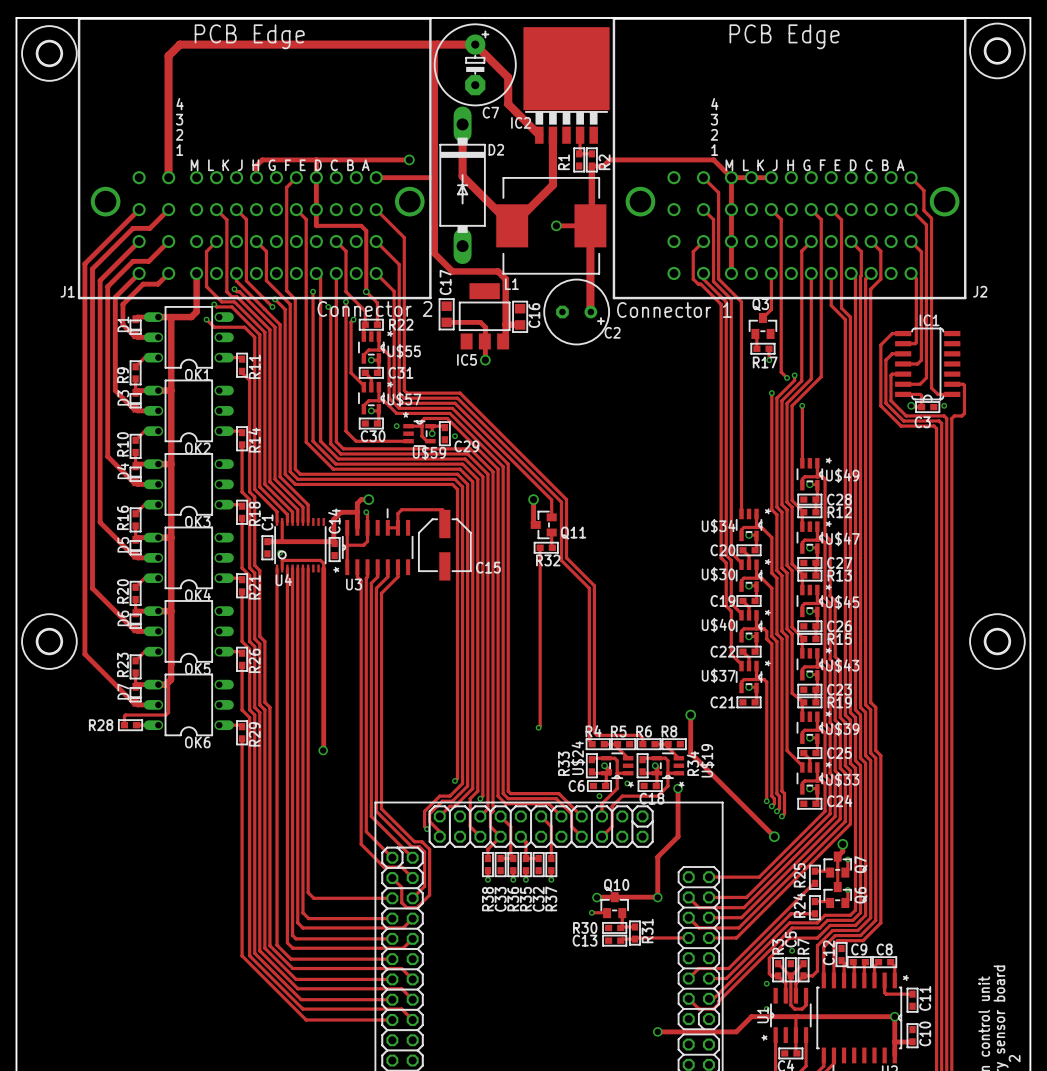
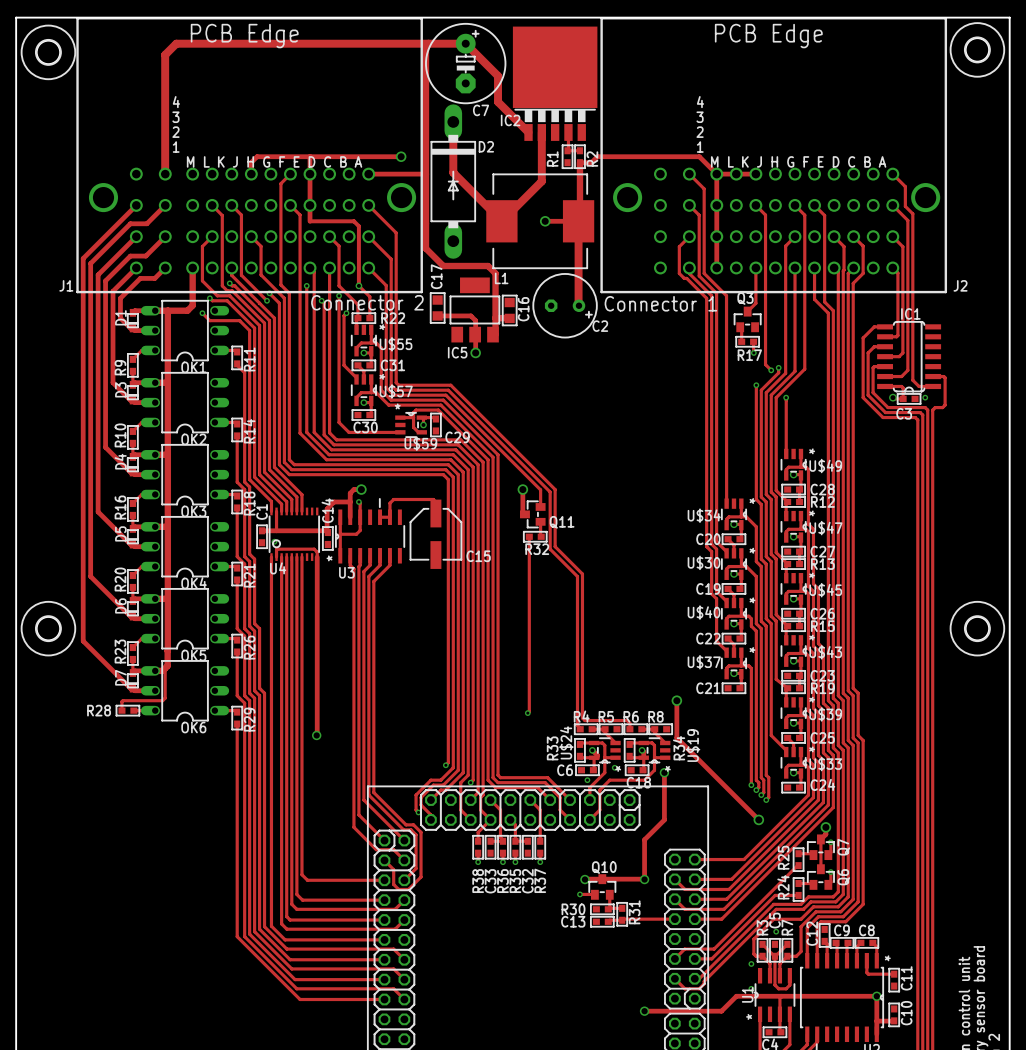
via: (396, 426) -> none
via: (454, 436) -> none

